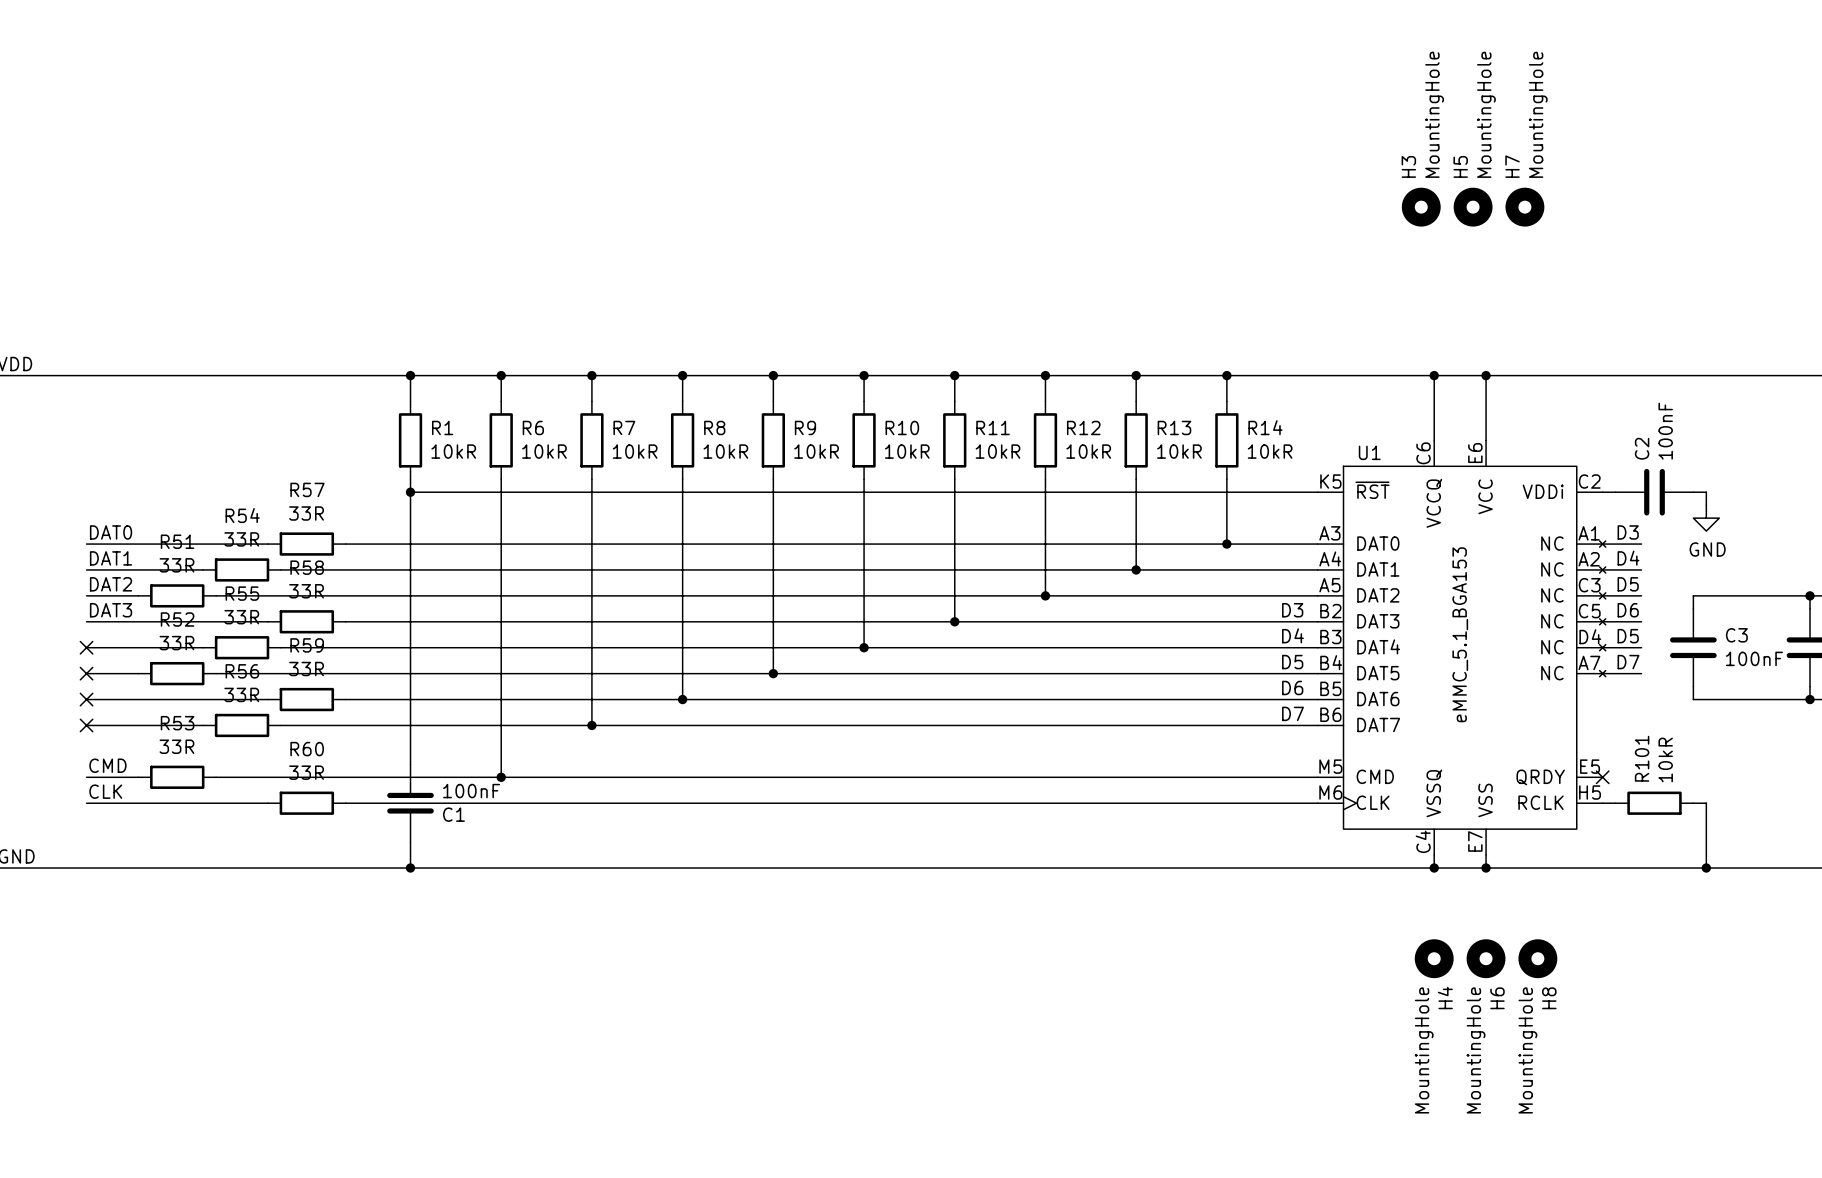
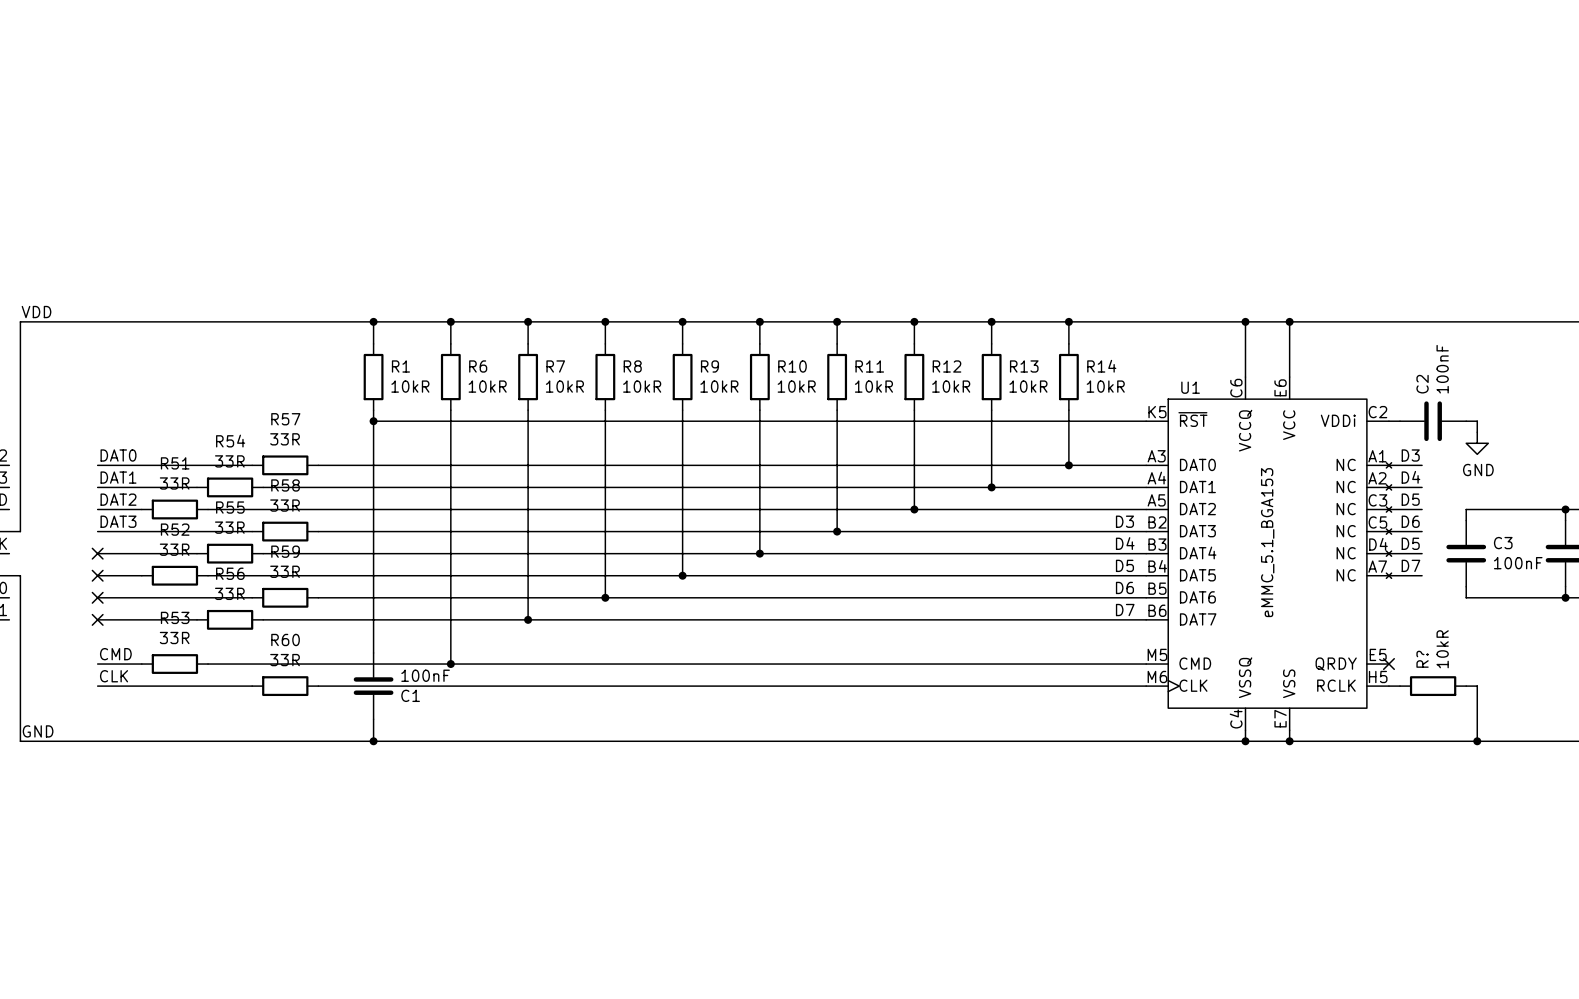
H3: MountingHole (1421, 207) -> none
H5: MountingHole (1473, 207) -> none
H7: MountingHole (1524, 207) -> none
R101 name: R101 (1642, 758) -> R? (1422, 659)
H4: MountingHole (1434, 958) -> none
H6: MountingHole (1486, 958) -> none
H8: MountingHole (1537, 958) -> none

